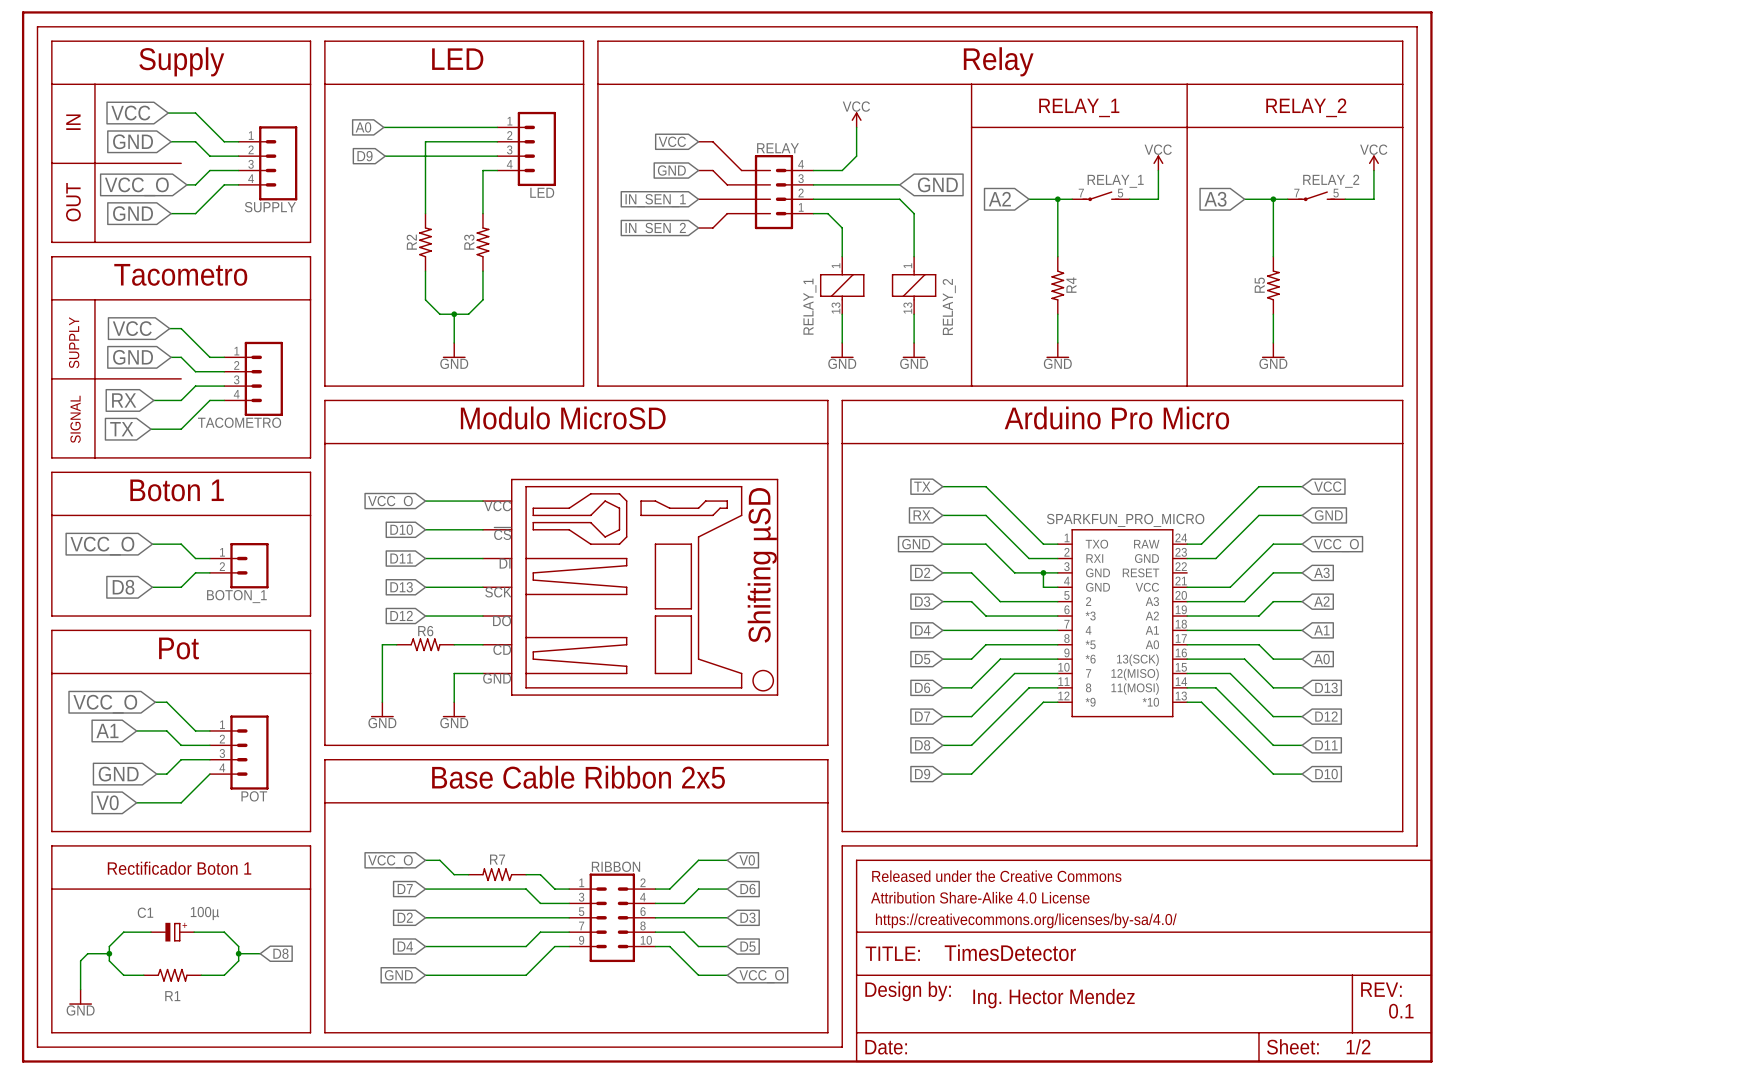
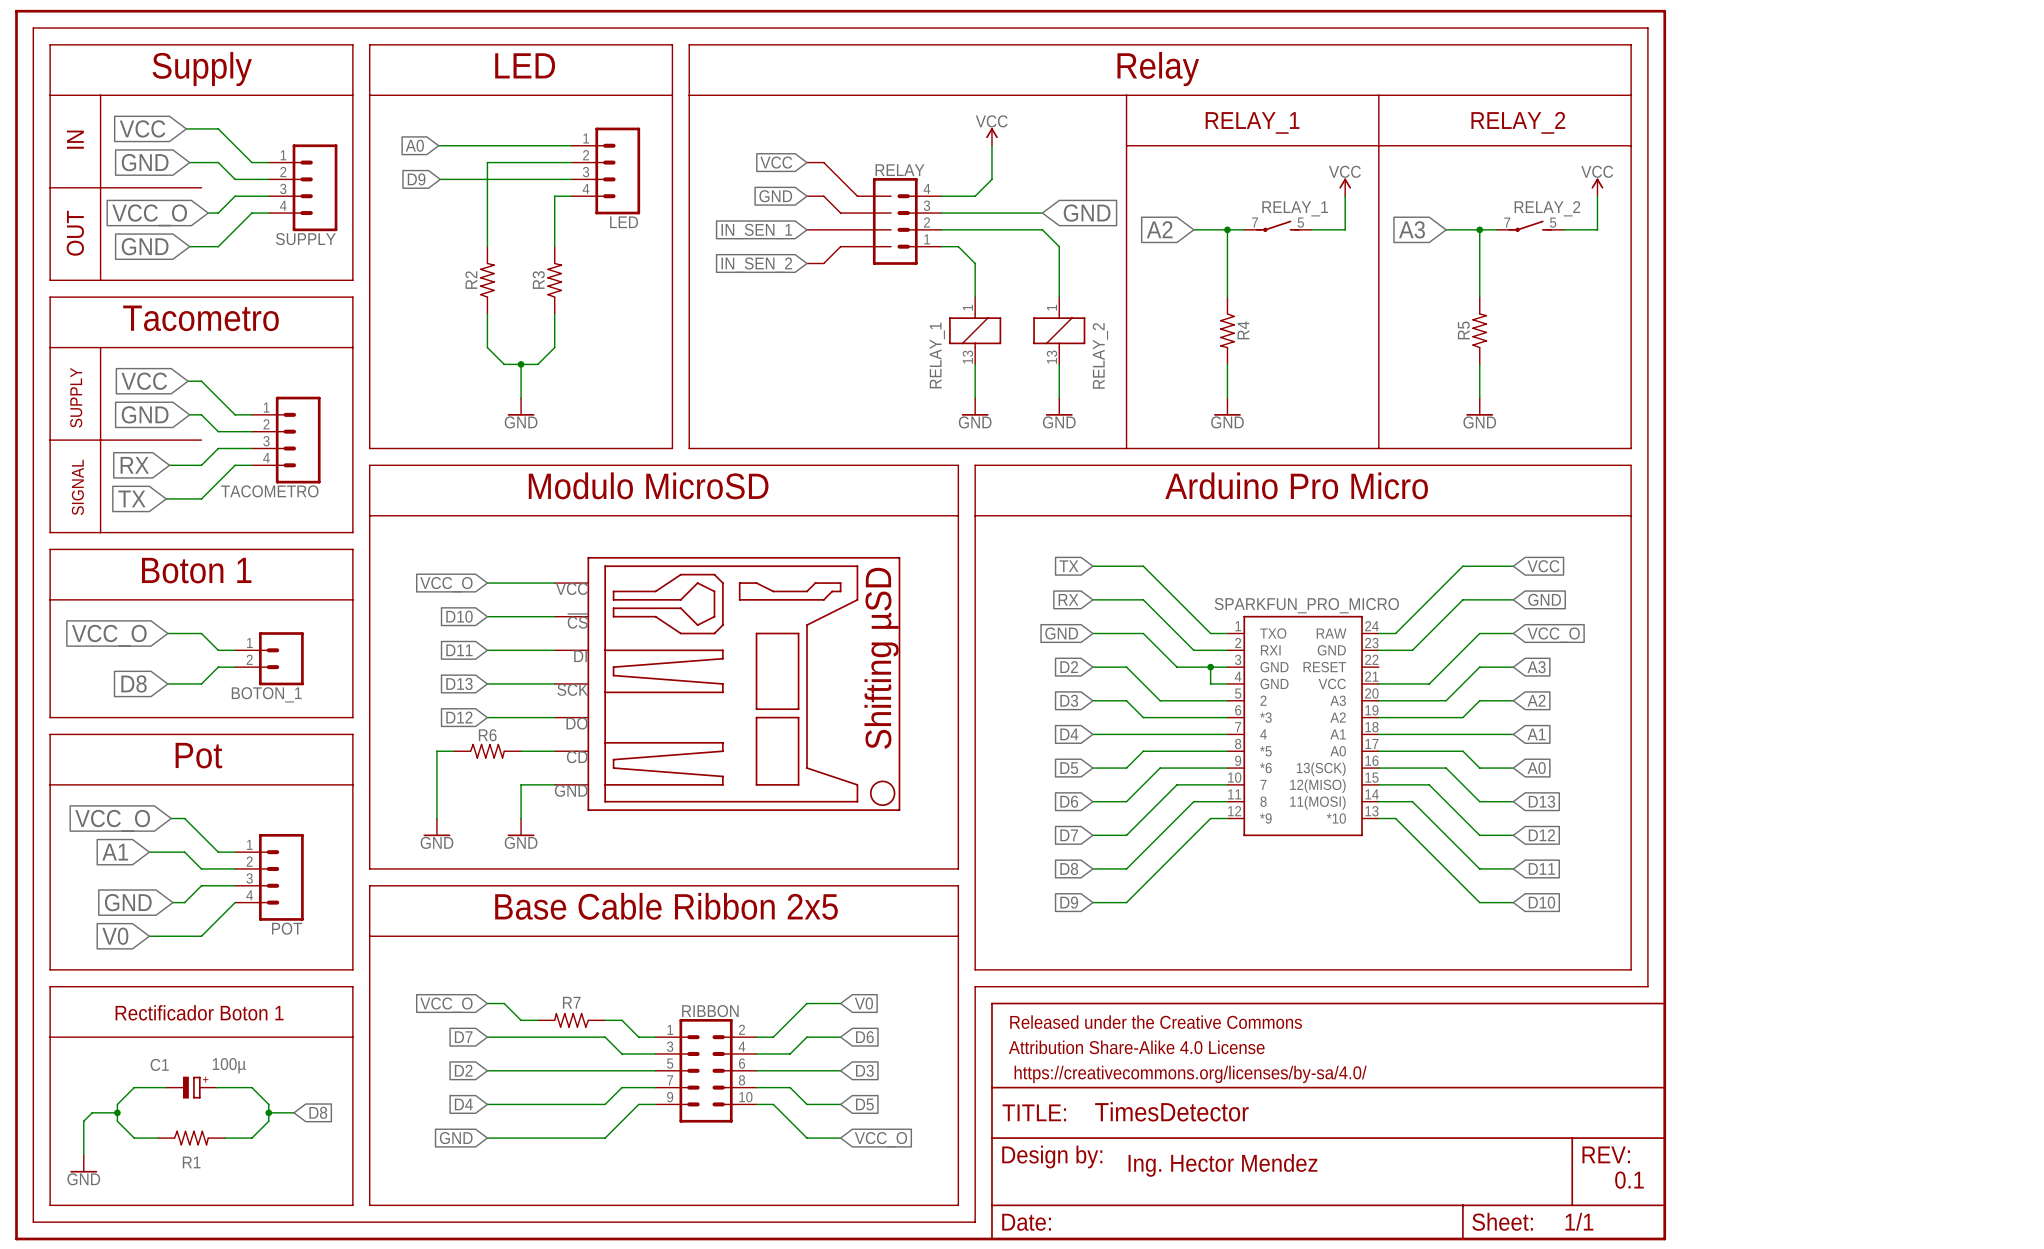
part text: 1/2 (1358, 1046) -> 1/1 (1579, 1221)

